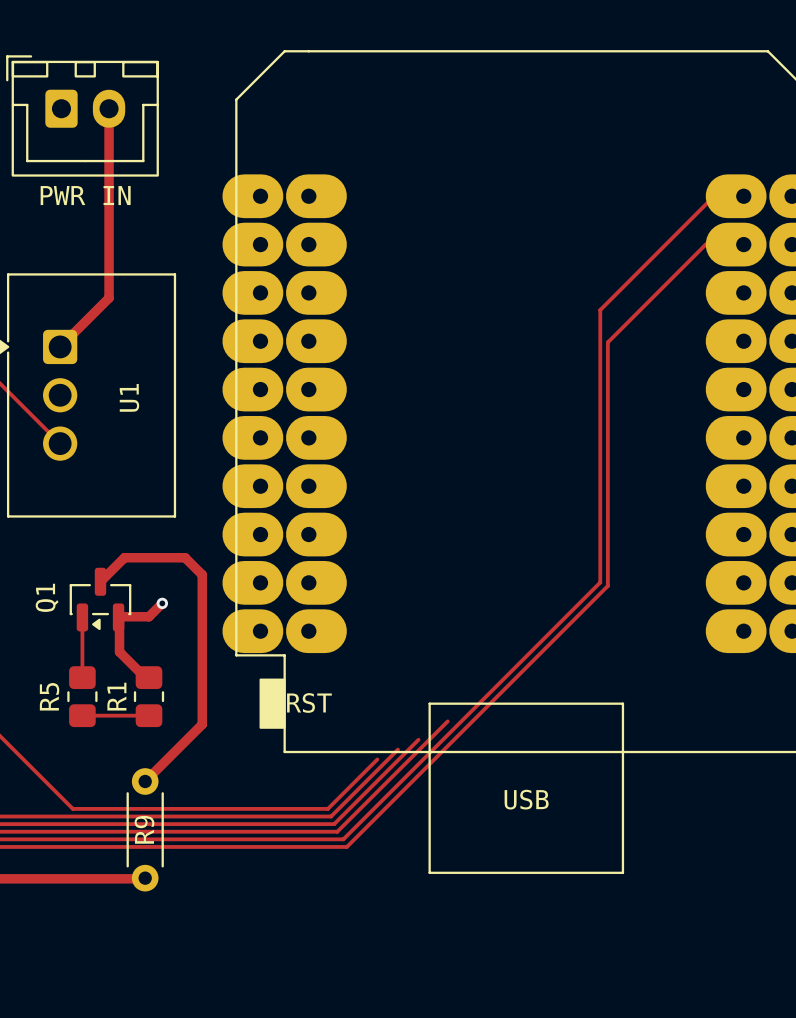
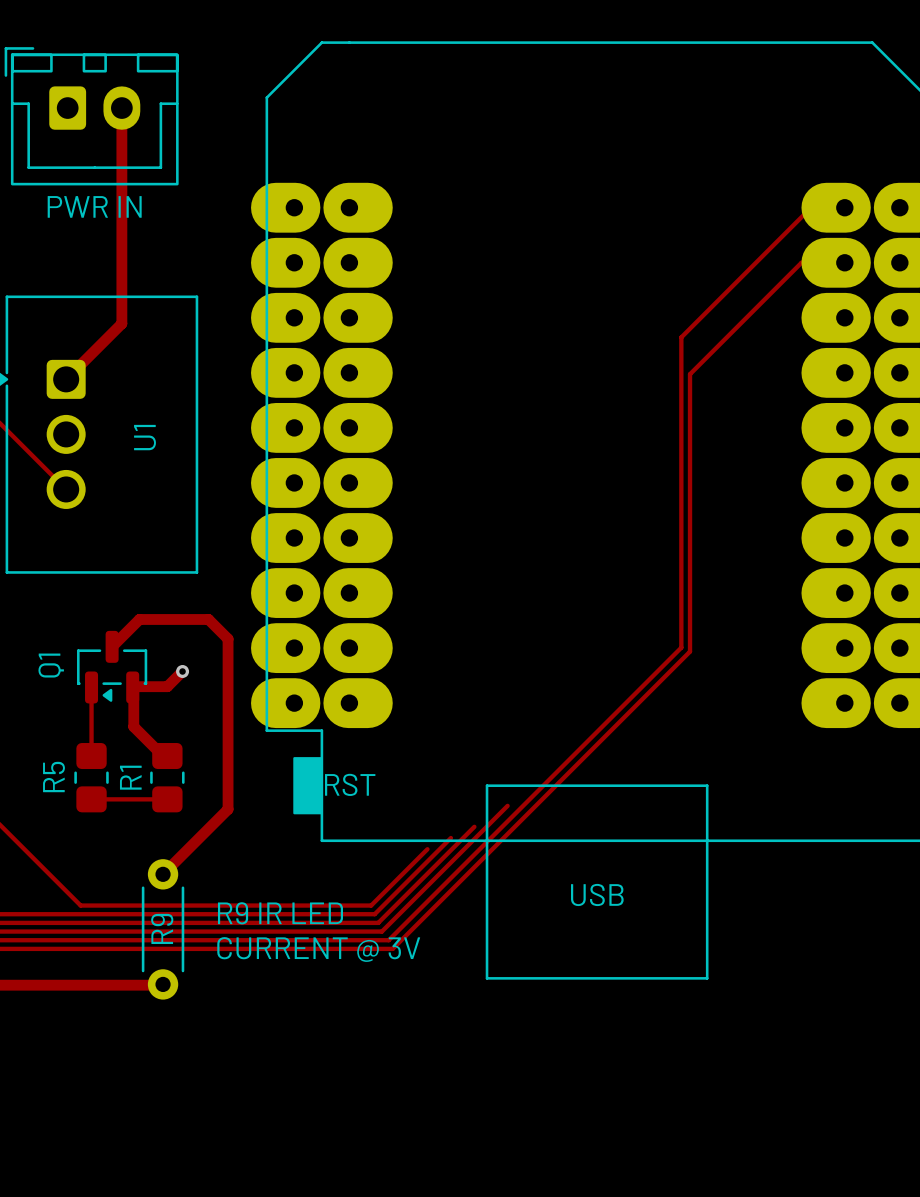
text: none -> R9 IR LED (280, 913)
text: none -> CURRENT @ 3V (318, 949)

